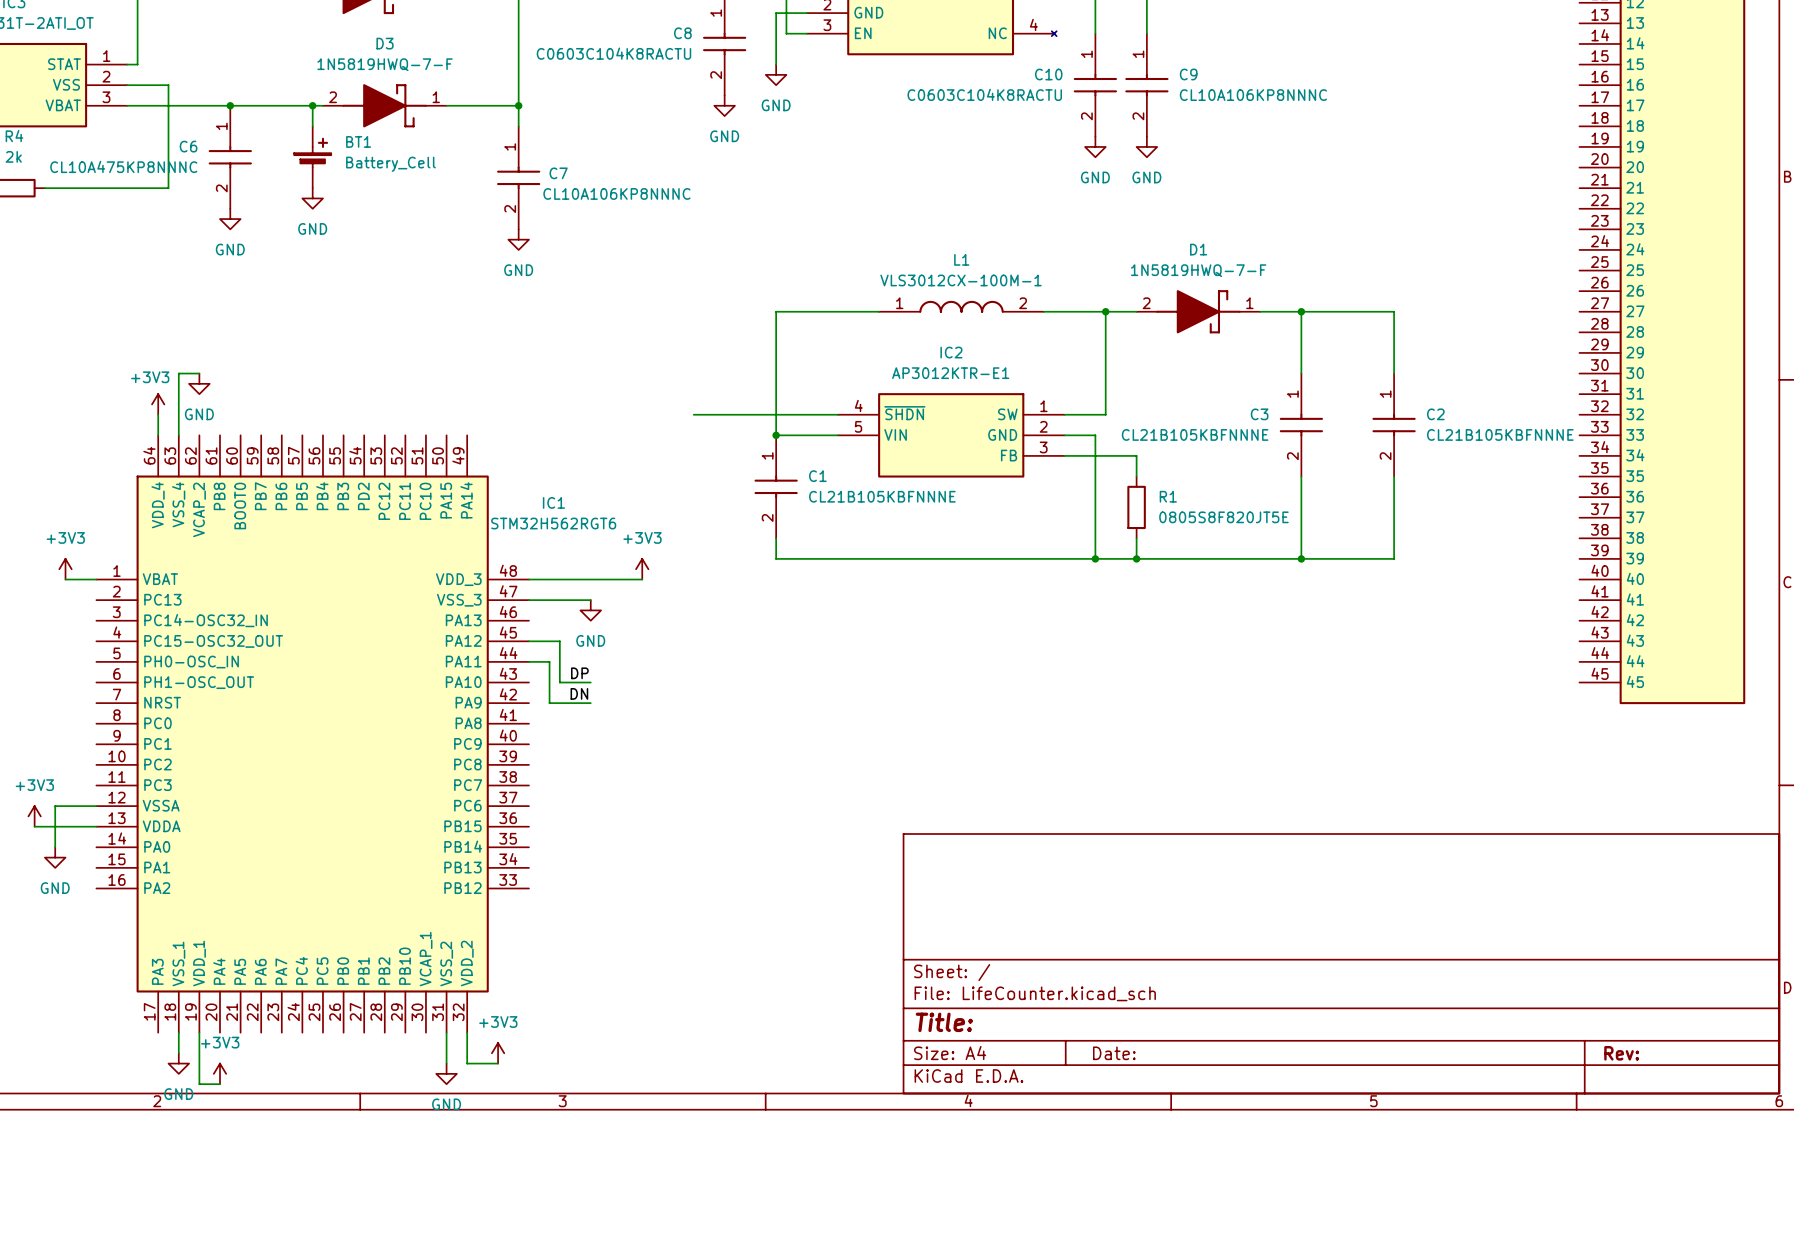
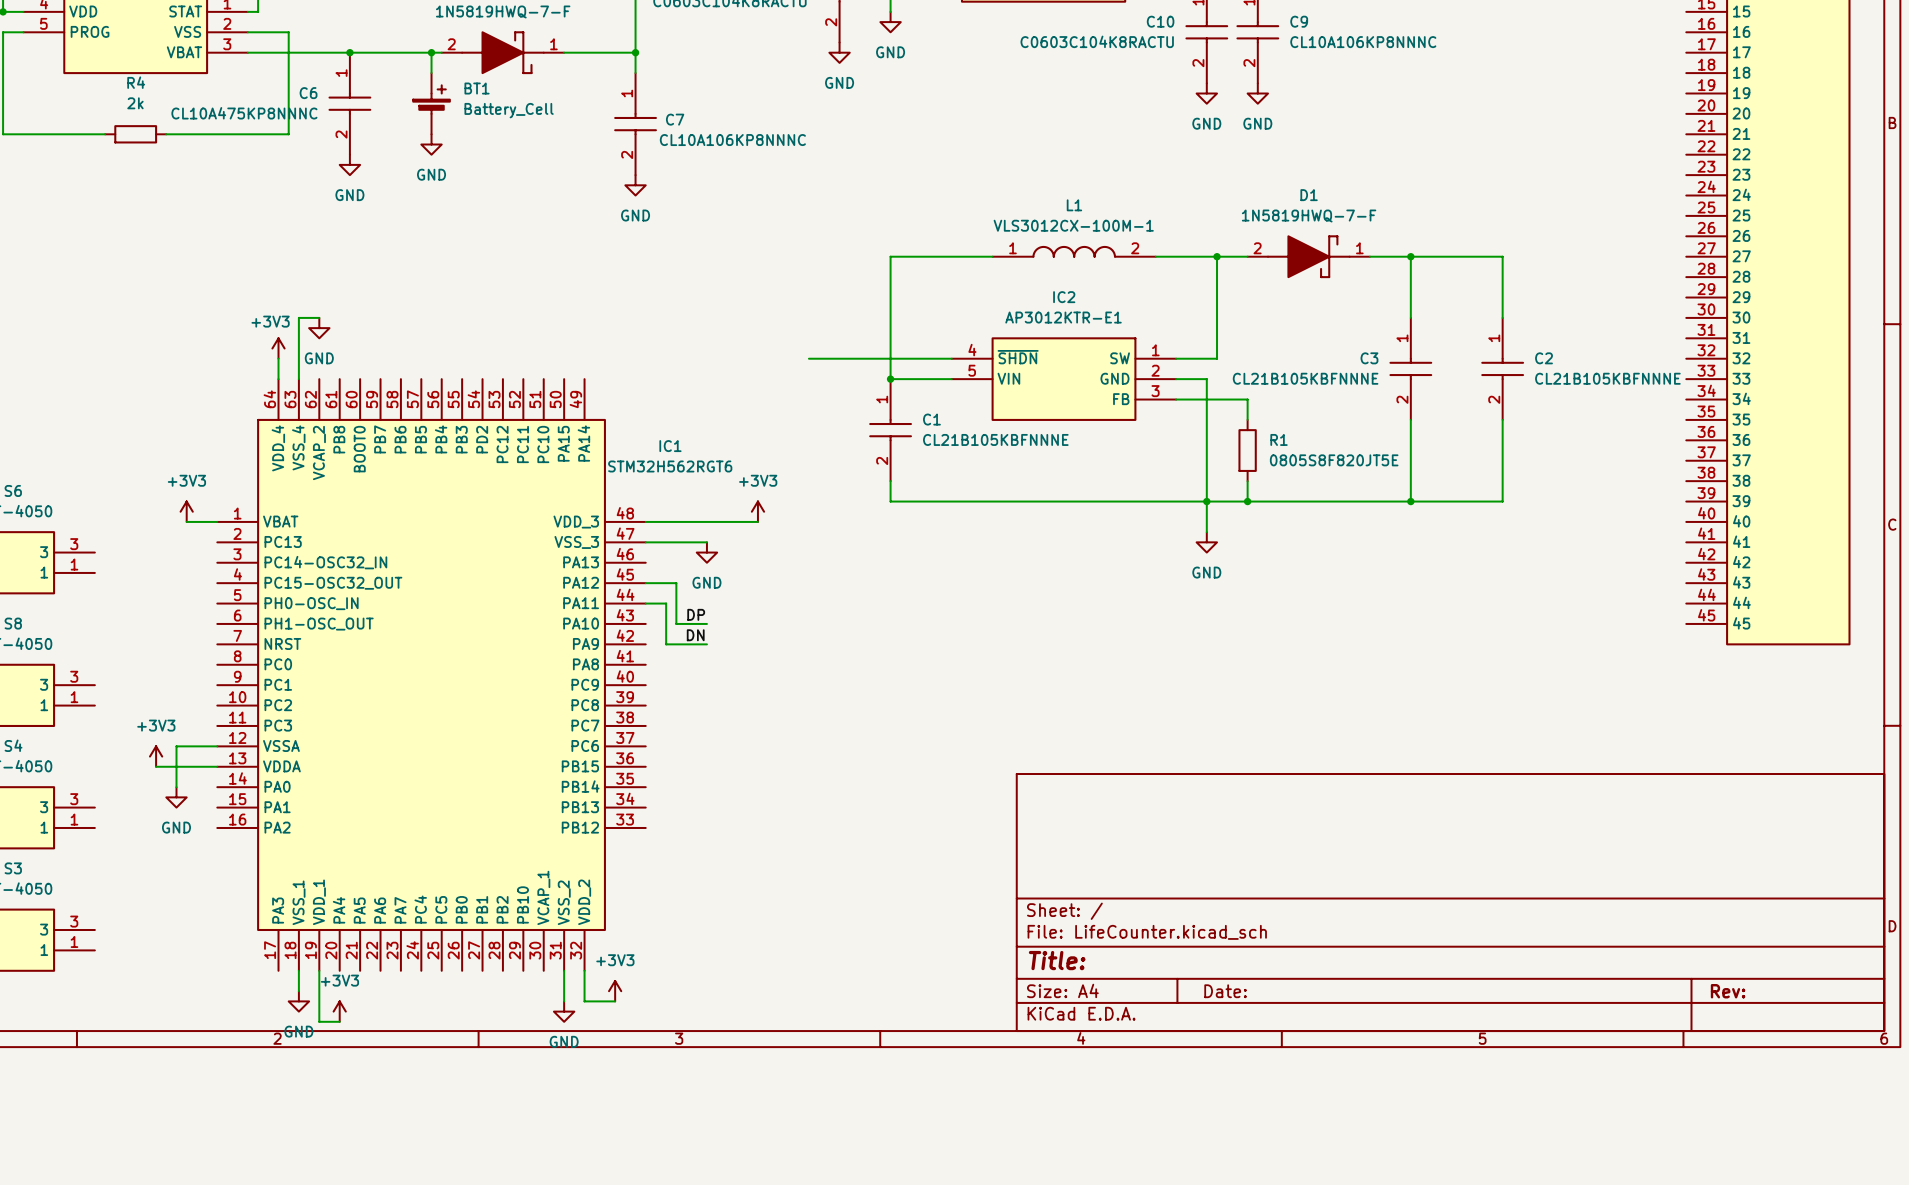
wire: none -> (1206, 501) (1206, 532)
power symbol: none -> GND (1206, 542)

